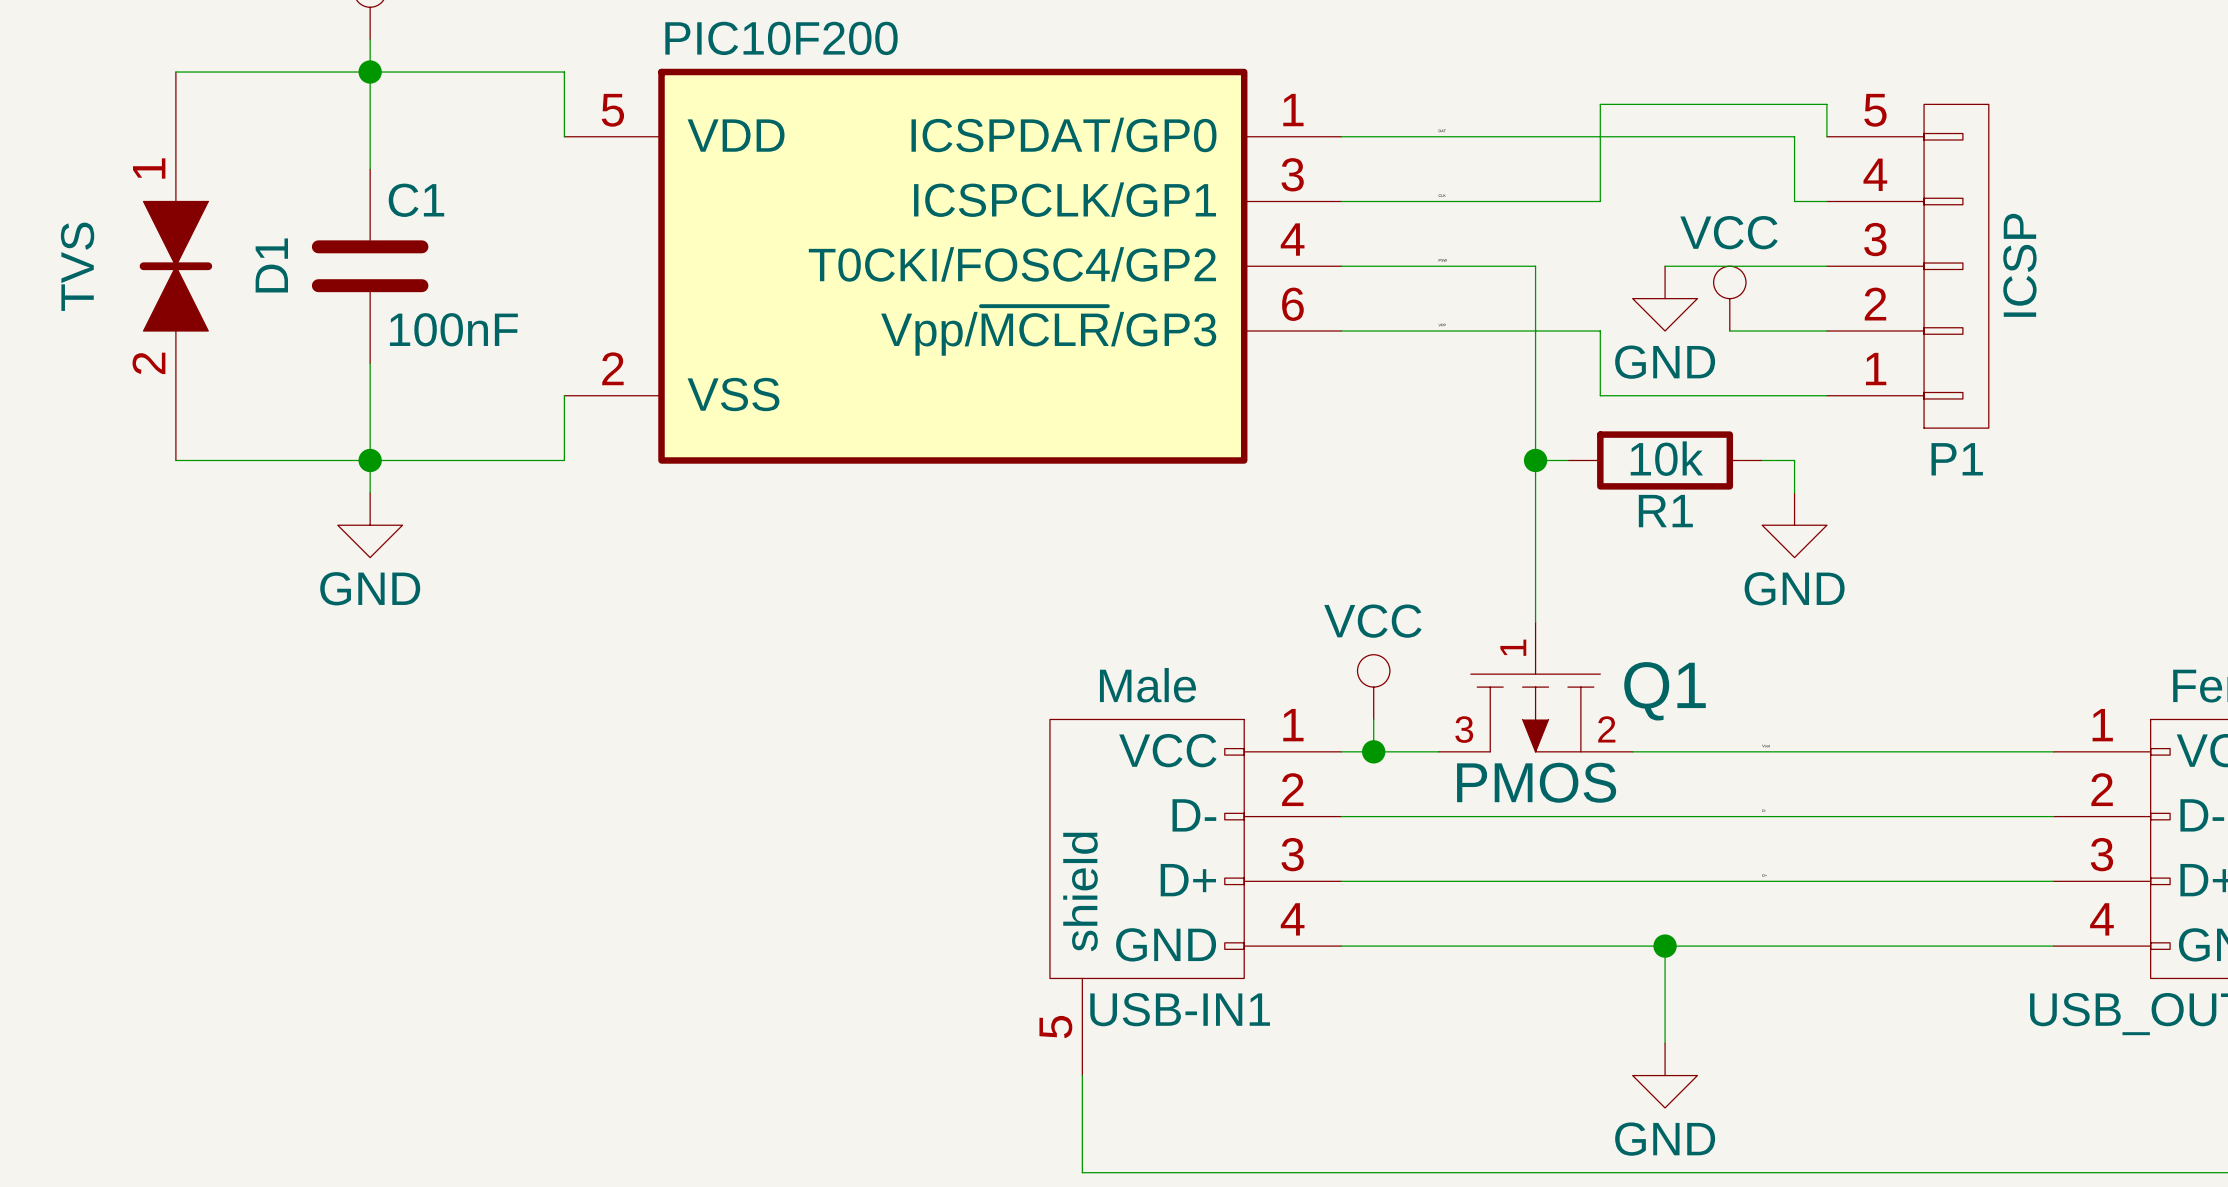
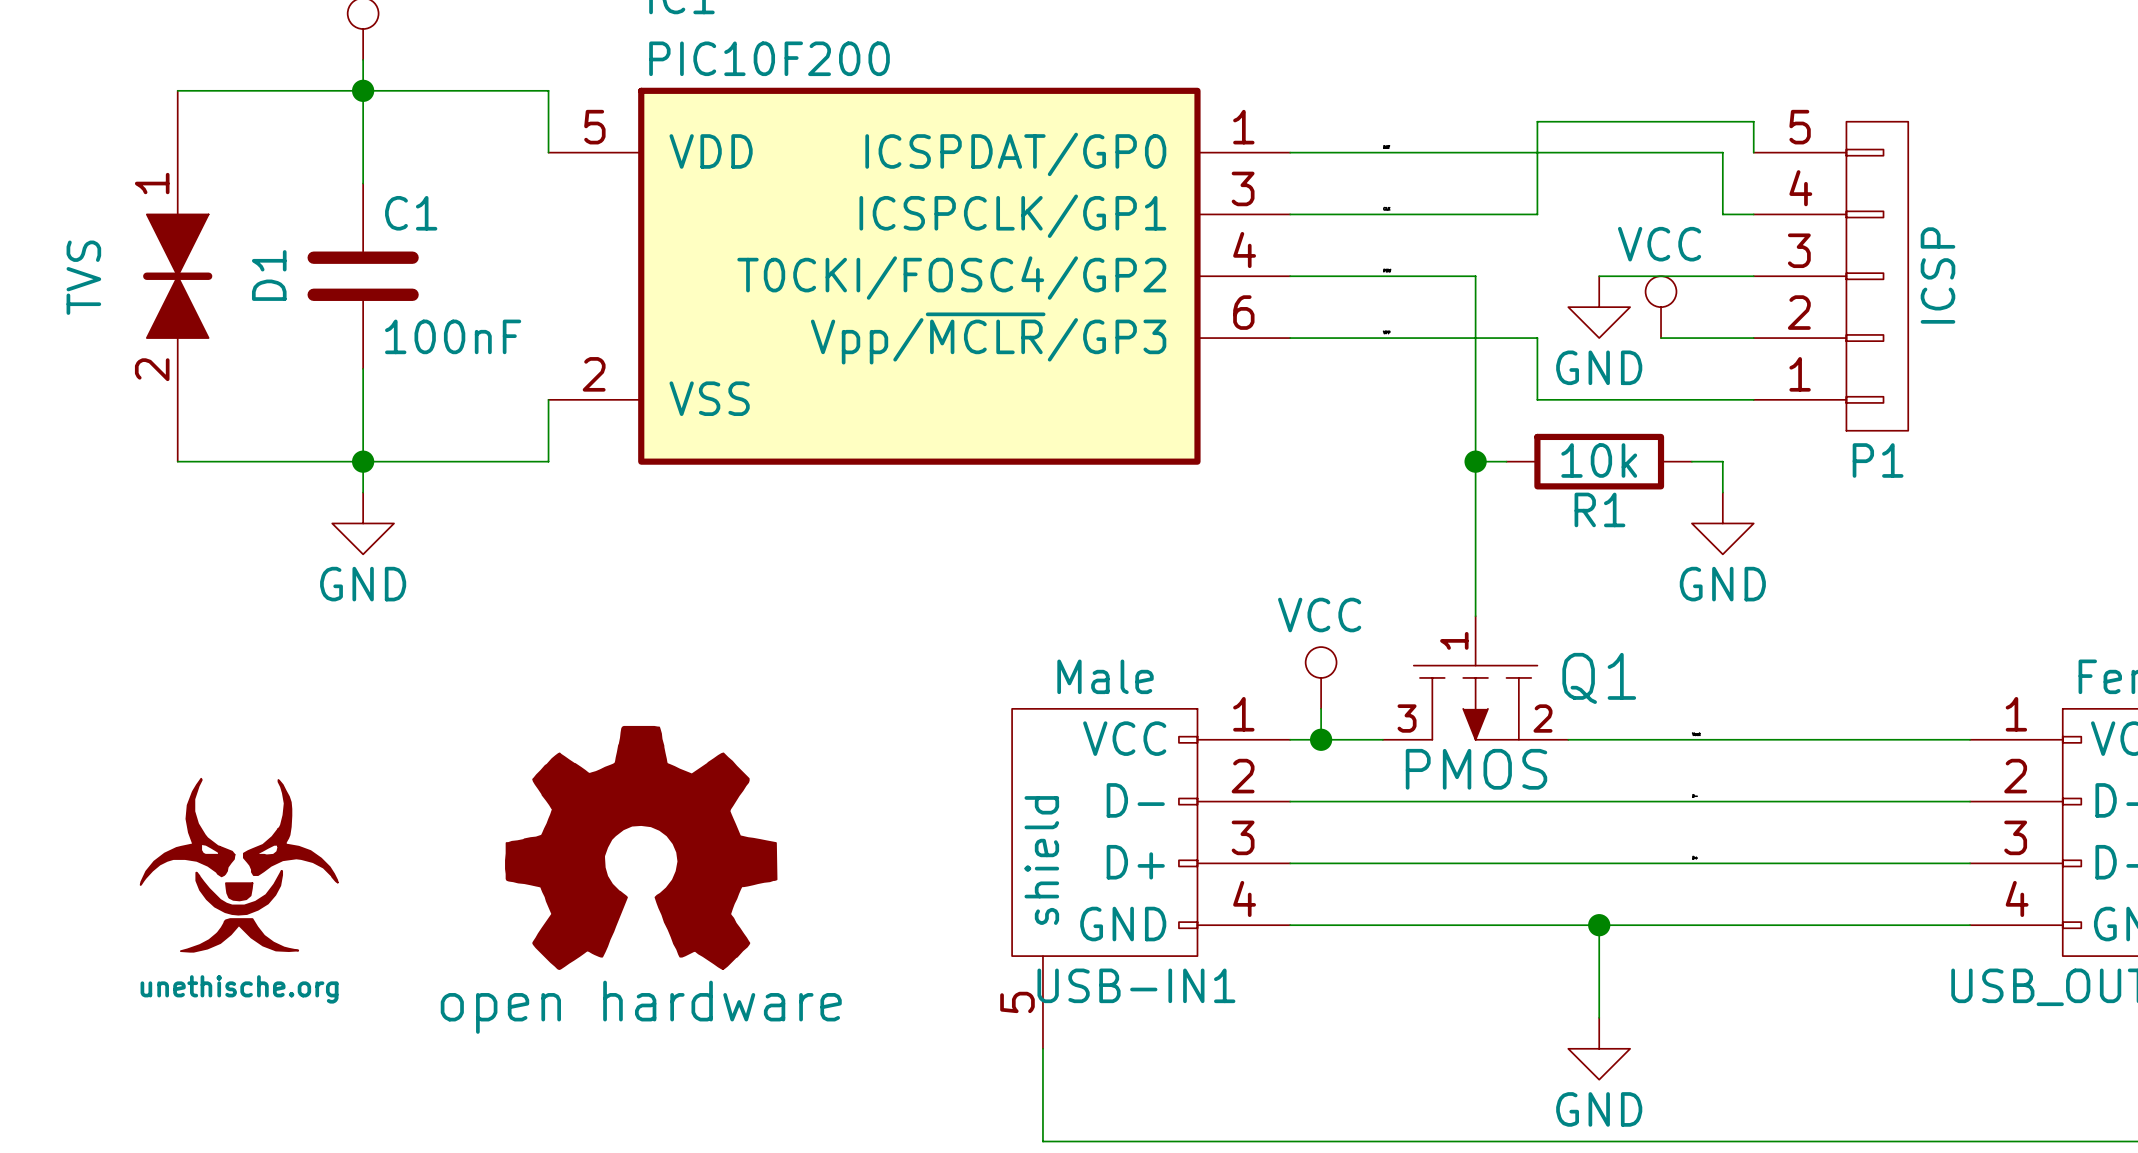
part: none -> open hardware (641, 847)
part: none -> unethische.org (239, 865)

